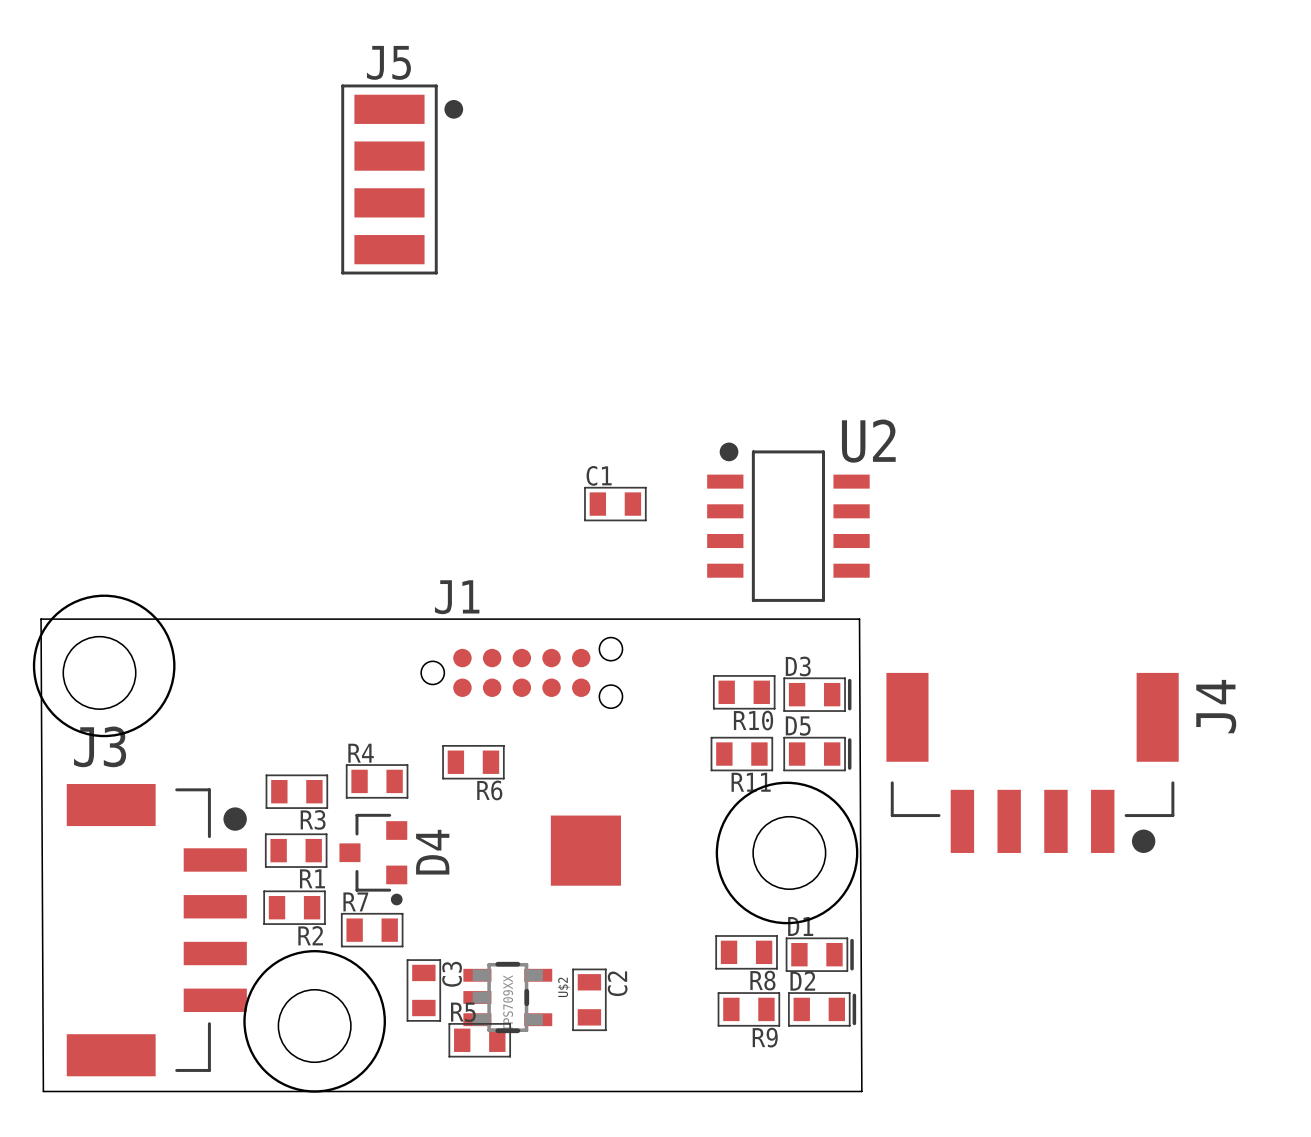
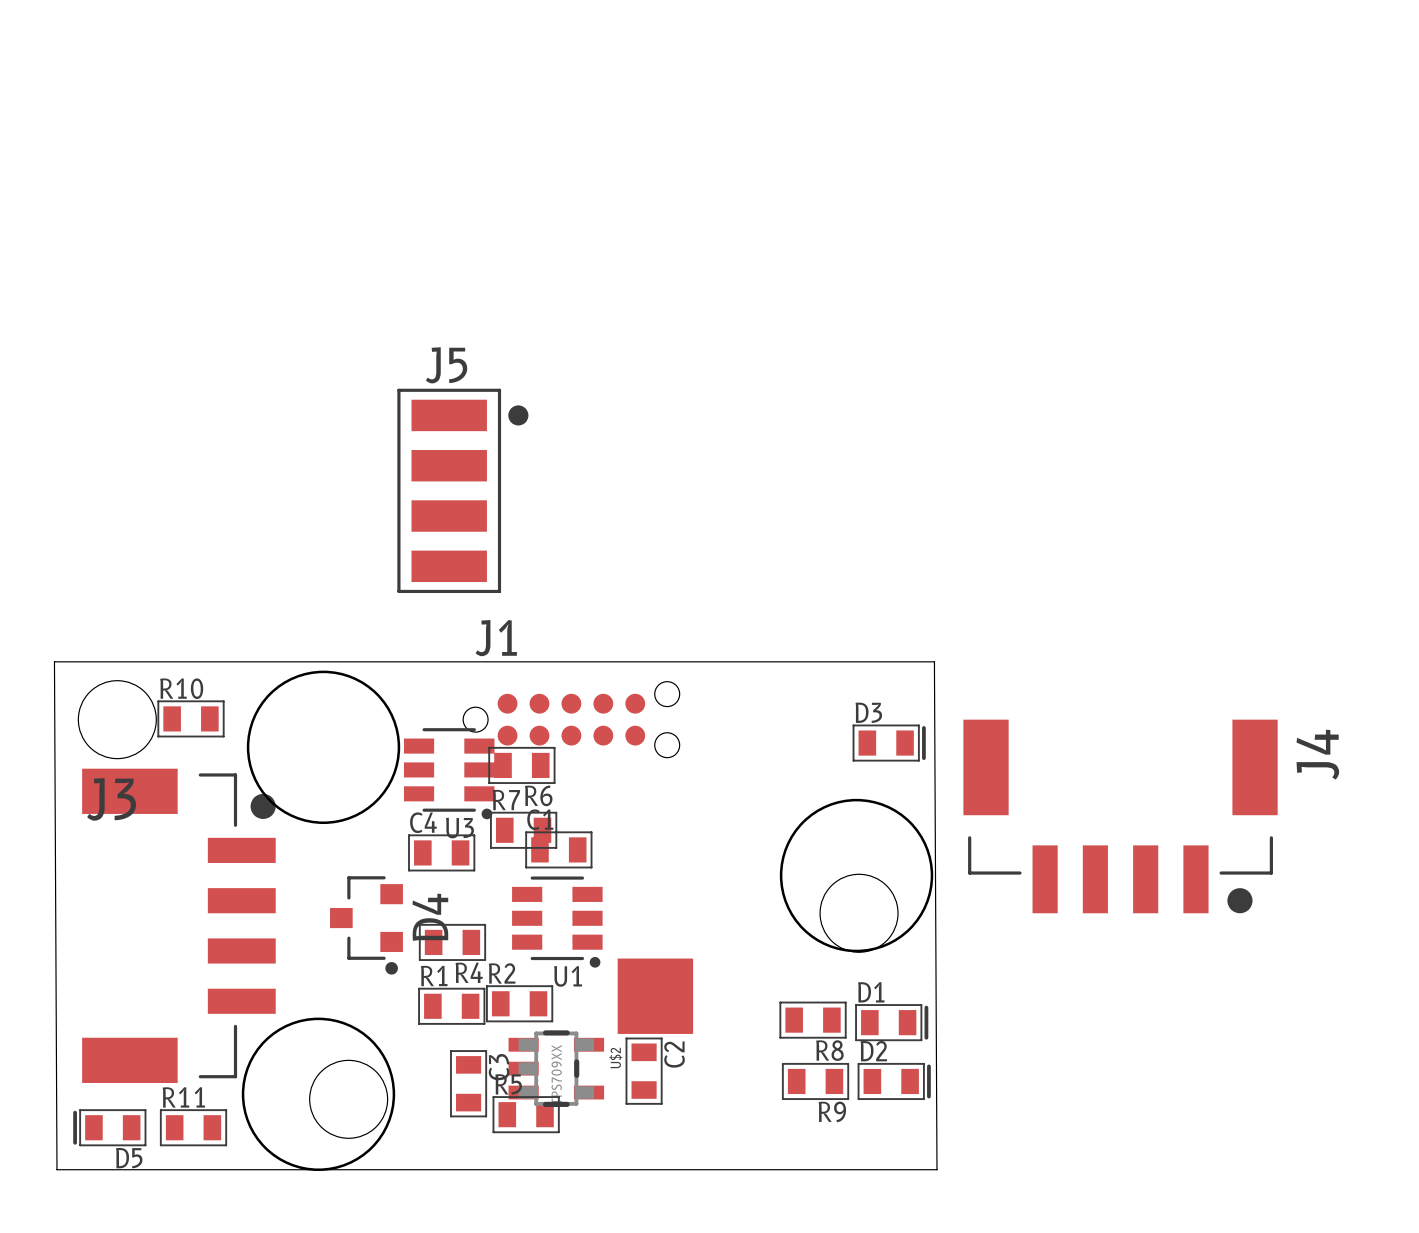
J5 position: (402, 179) -> (462, 490)
C1 position: (615, 504) -> (558, 849)
U2: (788, 522) -> none
round board edge: [32, 594, 176, 738] -> none
round board edge: none -> [246, 670, 401, 825]
R10 position: (744, 692) -> (190, 718)
R10 name position: R10 (753, 720) -> R10 (181, 688)
U3: none -> (449, 773)
R4 name position: R4 (361, 753) -> R4 (469, 972)
R11 position: (741, 754) -> (193, 1127)
D5 rotation: 0° (817, 754) -> 180° (109, 1127)
D5 position: (817, 754) -> (109, 1127)
R6 position: (473, 762) -> (521, 765)
R4 position: (377, 781) -> (452, 942)
R11 name position: R11 (751, 782) -> R11 (183, 1097)
R3: (296, 791) -> none
C4: none -> (441, 852)
R1 position: (296, 850) -> (451, 1006)
drawing position: (585, 850) -> (655, 996)
round board edge position: (787, 852) -> (856, 875)
D4 position: (373, 859) -> (366, 925)
U1: none -> (557, 922)
R1 name position: R1 (312, 878) -> R1 (434, 975)
R2 position: (294, 907) -> (519, 1003)
J3 position: (156, 930) -> (178, 925)
R7 position: (372, 930) -> (523, 830)
R2 name position: R2 (310, 935) -> R2 (502, 973)
C3 position: (423, 990) -> (468, 1083)
round board edge position: (314, 1021) -> (318, 1094)

